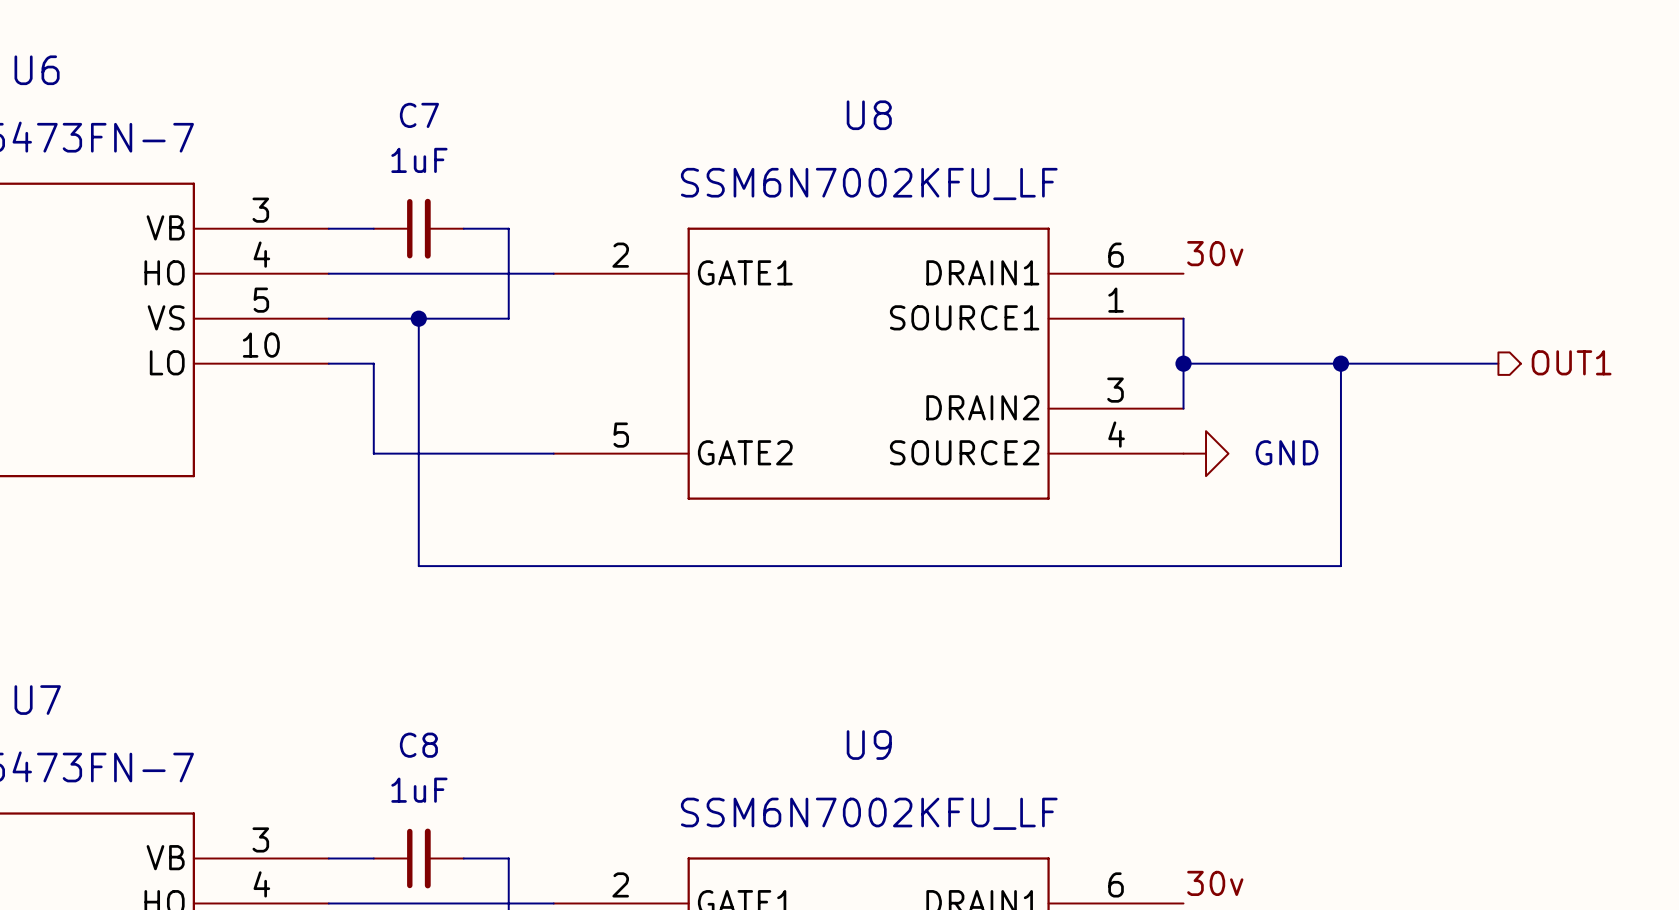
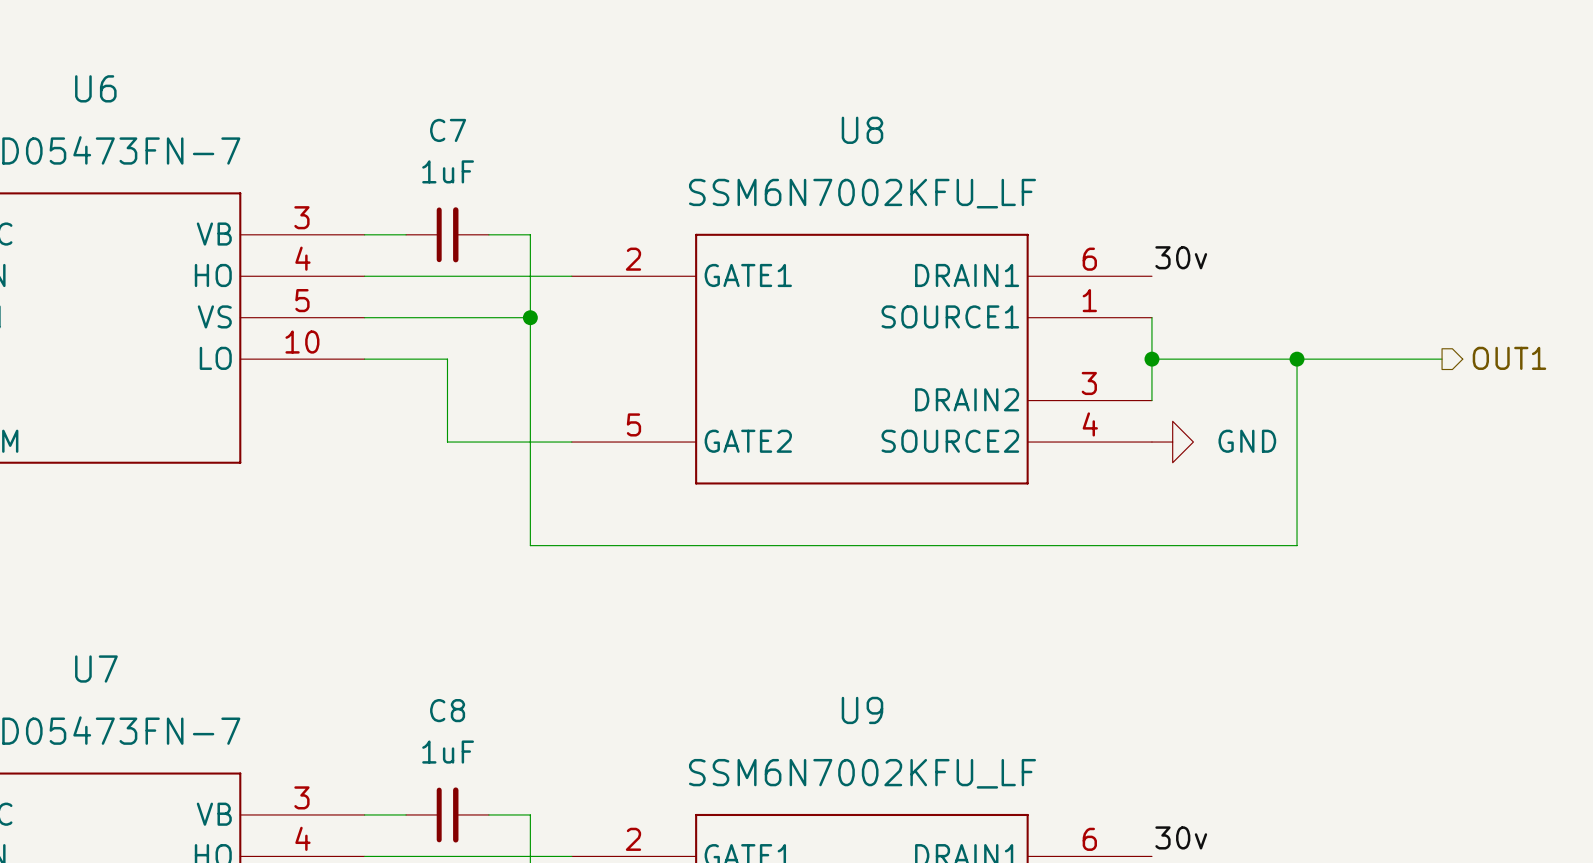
wire: (418, 318) (418, 363) -> (406, 359) (447, 359)
junction position: (418, 318) -> (530, 317)
wire: (373, 363) (373, 453) (418, 453) (418, 566) (508, 566) -> (530, 317) (530, 545)

